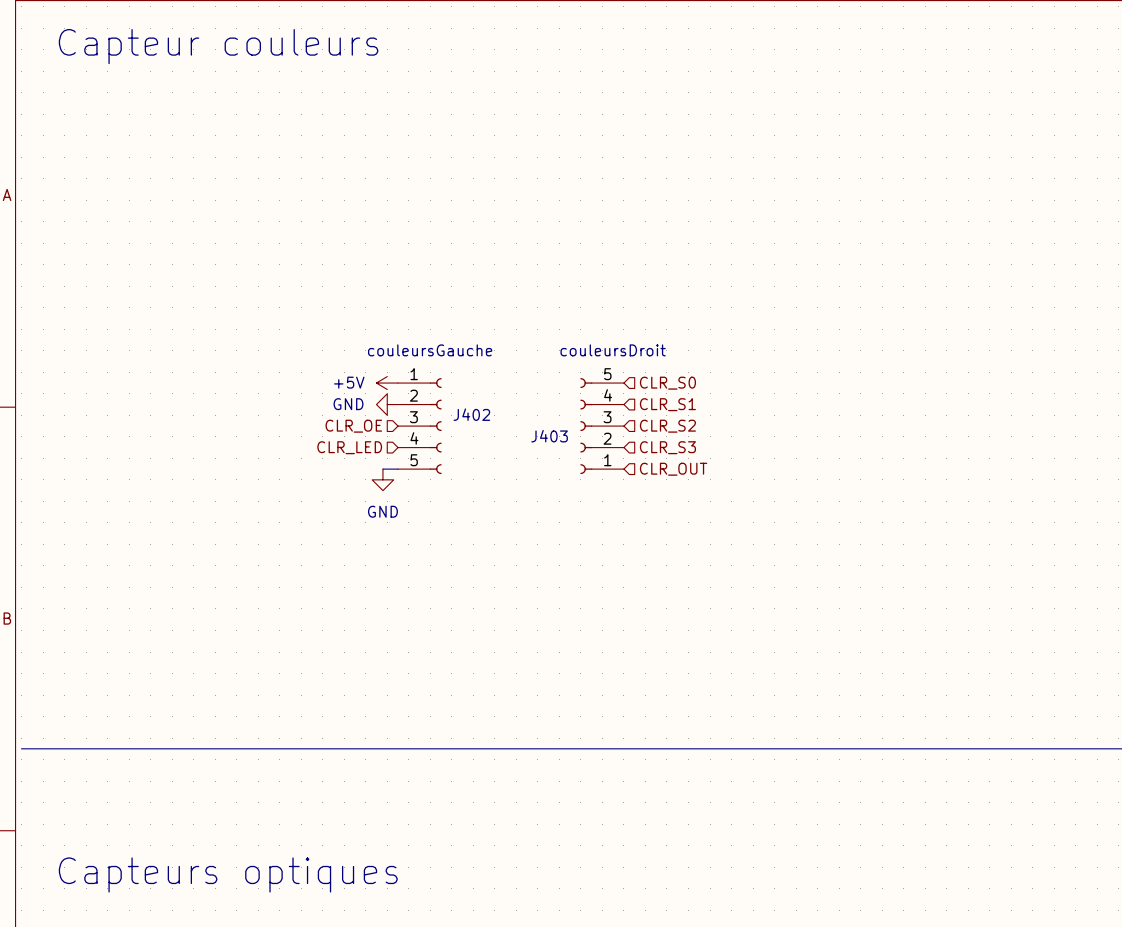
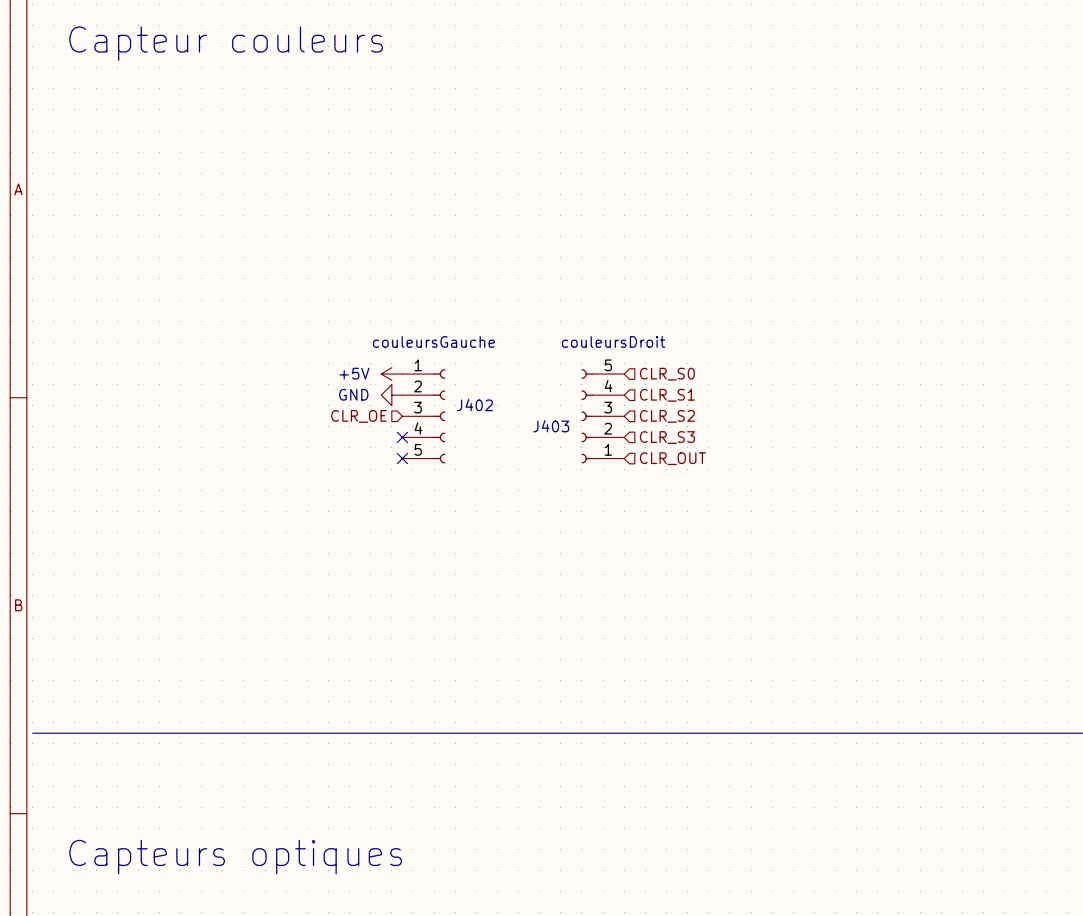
hierarchical label: CLR_LED (349, 447) -> none
no-connect mark: none -> (402, 437)
wire: (382, 469) (398, 469) -> none
no-connect mark: none -> (402, 458)
power symbol: GND (382, 479) -> none

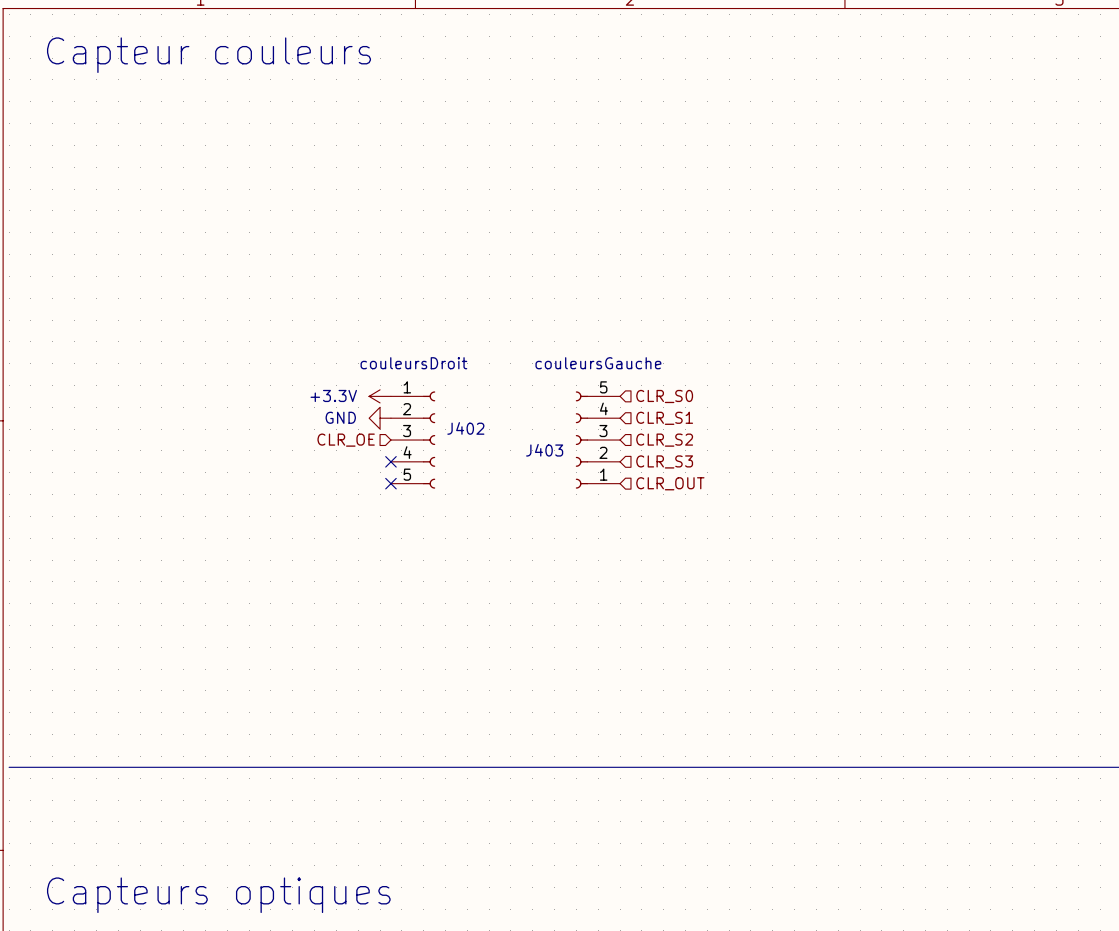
J402 value: couleursGauche (433, 341) -> couleursDroit (413, 363)
J403 value: couleursDroit (613, 341) -> couleursGauche (598, 363)
power symbol: +5V (391, 374) -> +3.3V (380, 396)

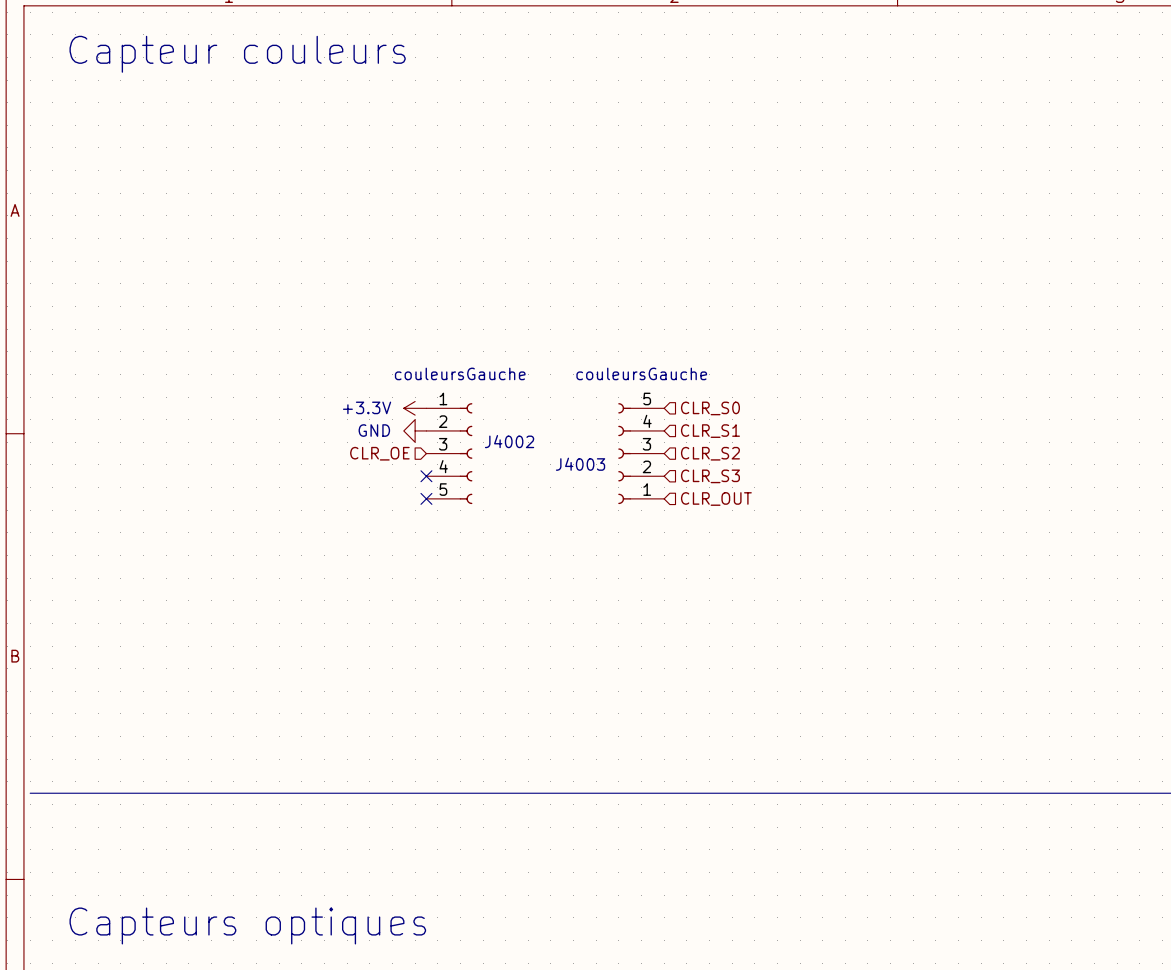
J402 value: couleursDroit (413, 363) -> couleursGauche (460, 373)
J402 name: J402 (465, 428) -> J4002 (509, 441)
J403 name: J403 (544, 450) -> J4003 (580, 464)

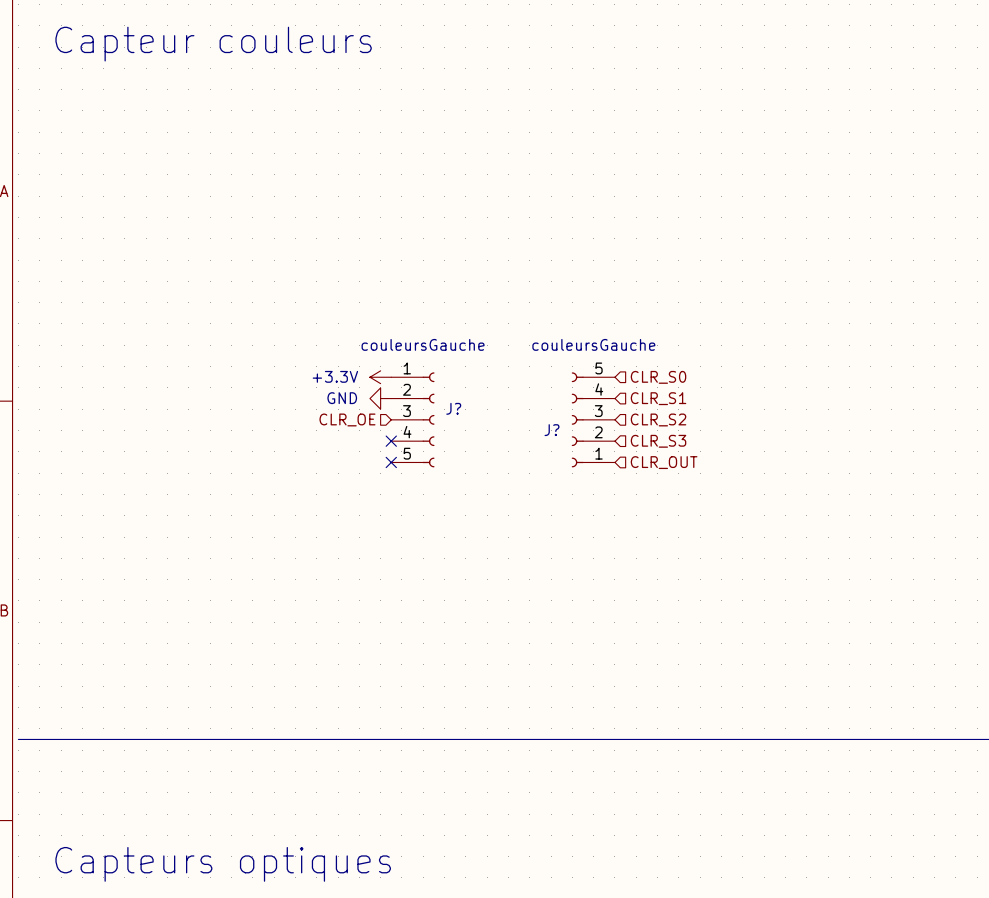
J4002 name: J4002 (509, 441) -> J? (453, 408)
J4003 name: J4003 (580, 464) -> J? (552, 430)

